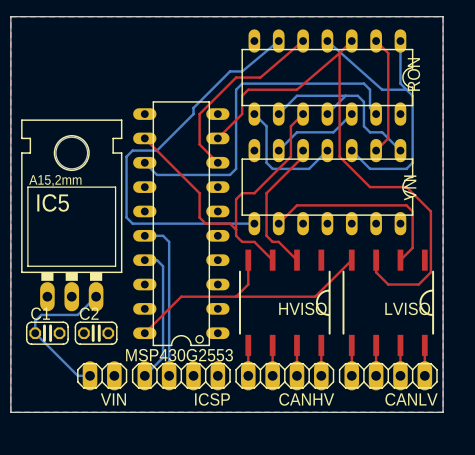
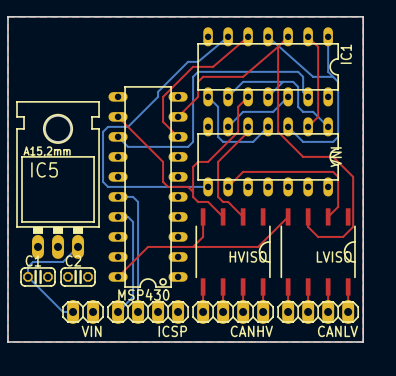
RON name: RON (413, 74) -> IC1 (346, 54)
MSP430G2553 name: MSP430G2553 (179, 355) -> MSP430 (143, 294)

